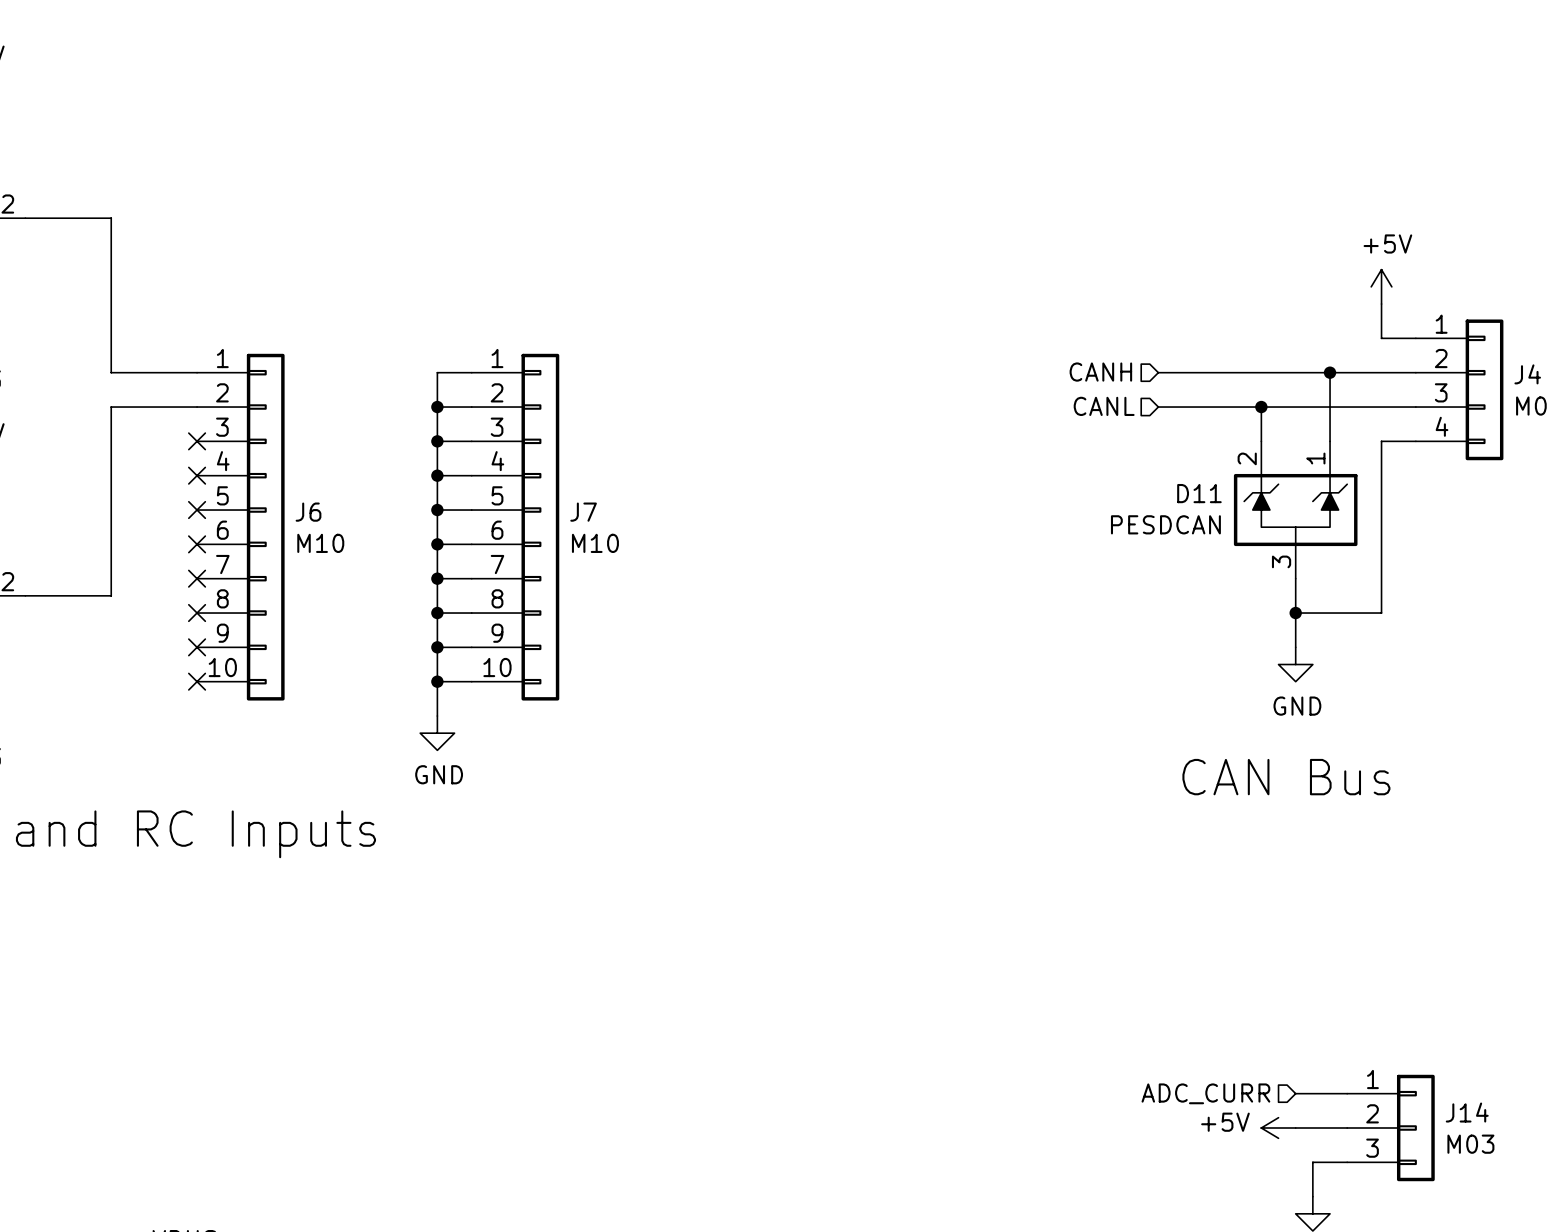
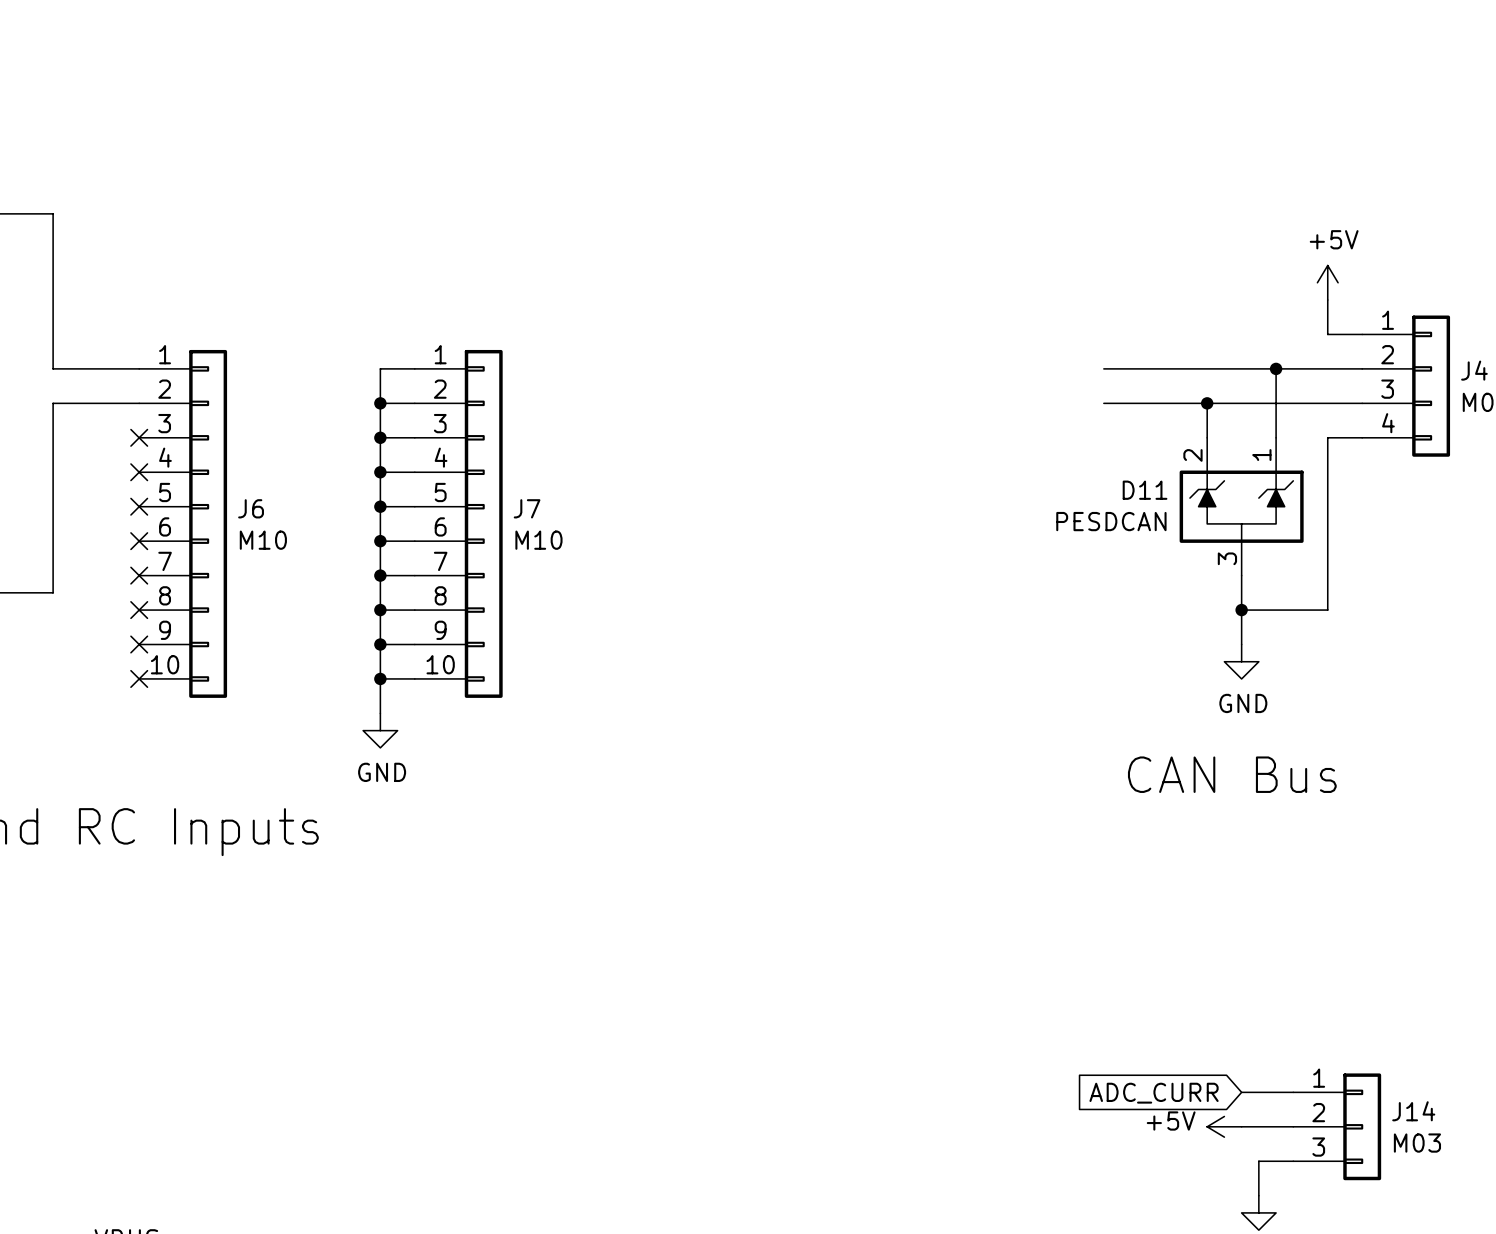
hierarchical label: CANH (1100, 372) -> none
hierarchical label: CANL (1104, 406) -> none
hierarchical label: ADC_CURR (1205, 1093) -> none
global label: none -> ADC_CURR (1154, 1093)

